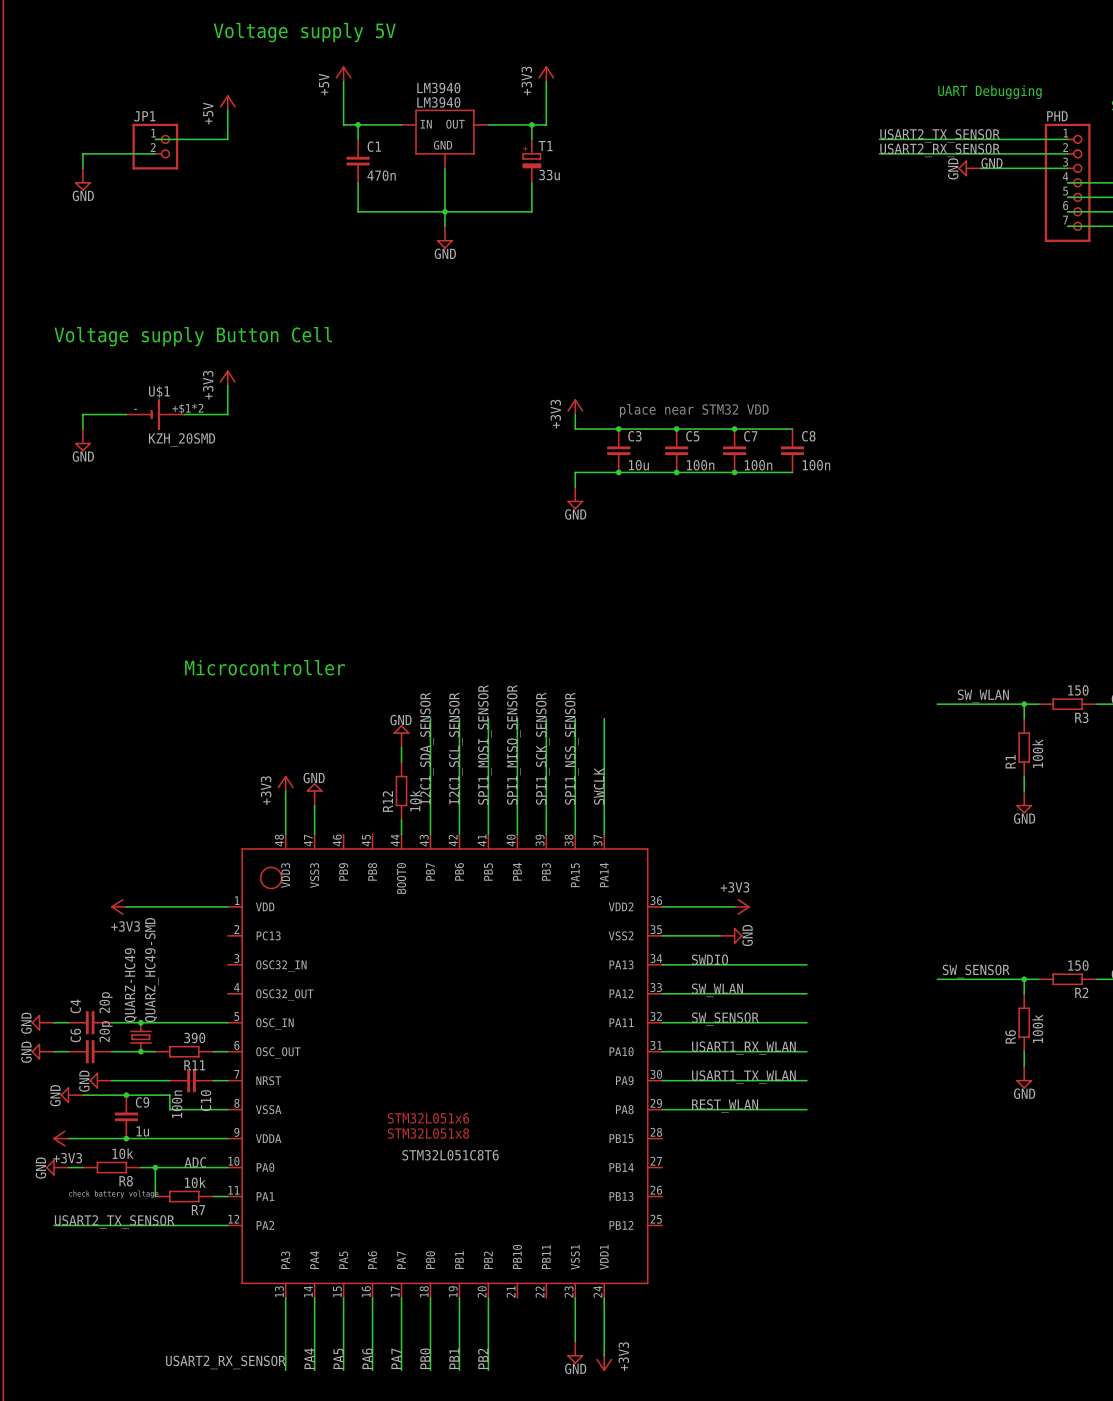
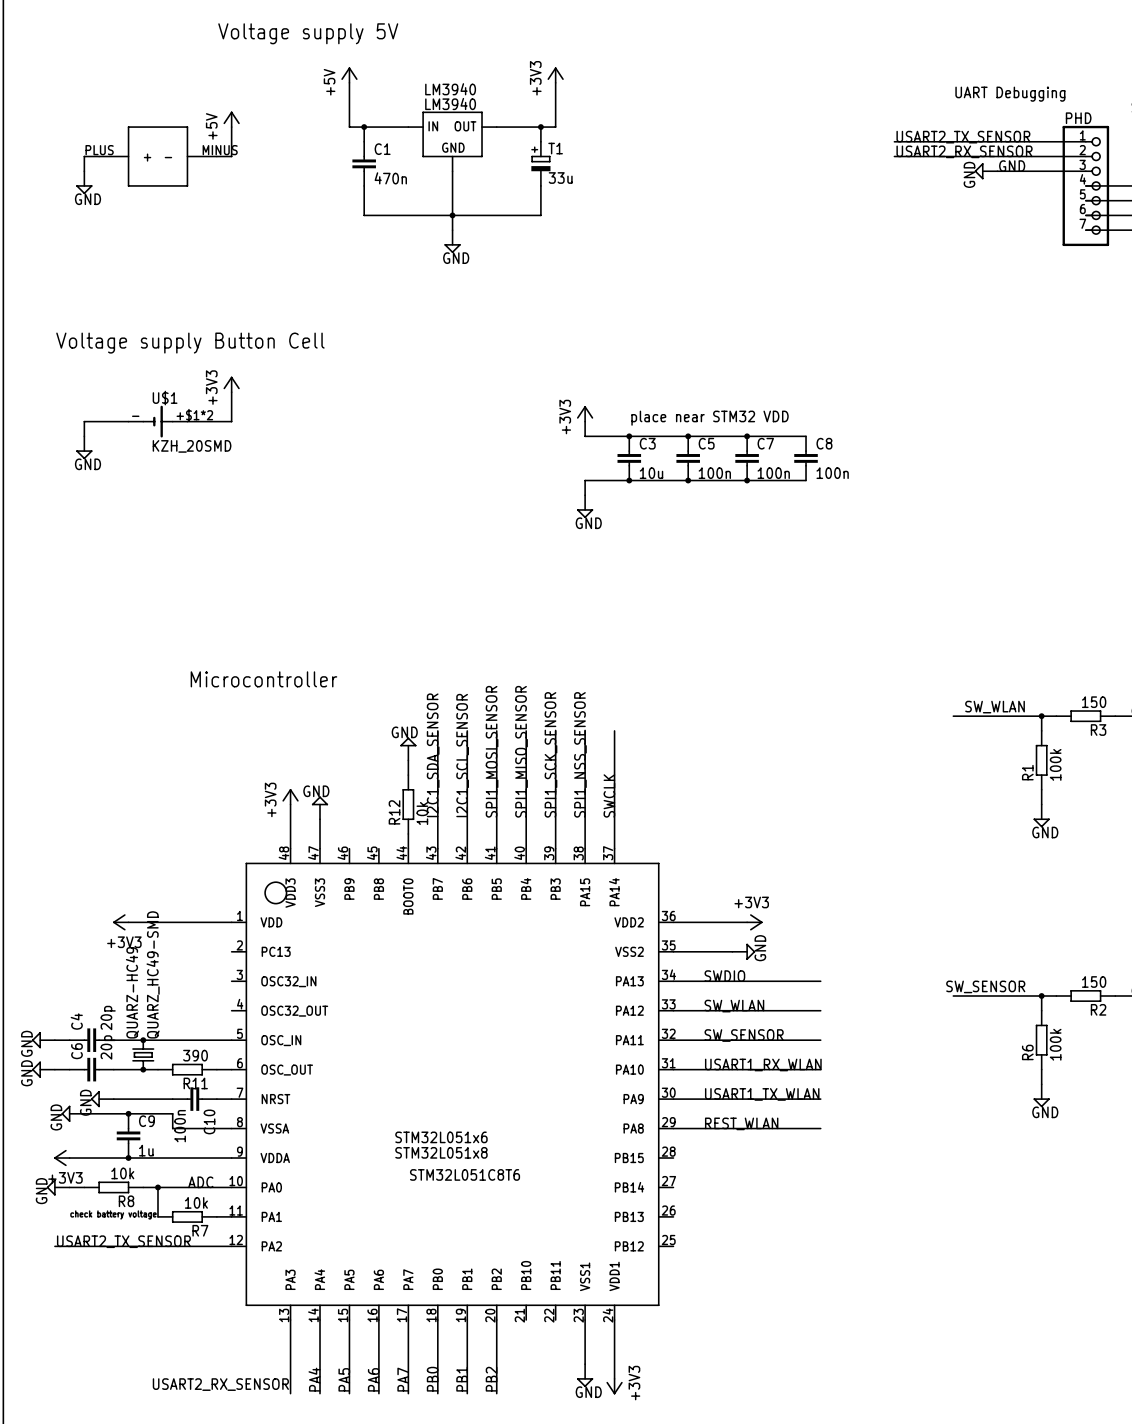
power symbol position: +5V (227, 102) -> +5V (231, 119)
wire: (155, 139) (227, 139) -> (216, 156) (231, 156) (231, 141)
JP1: (155, 146) -> none
part: none -> (157, 156)

